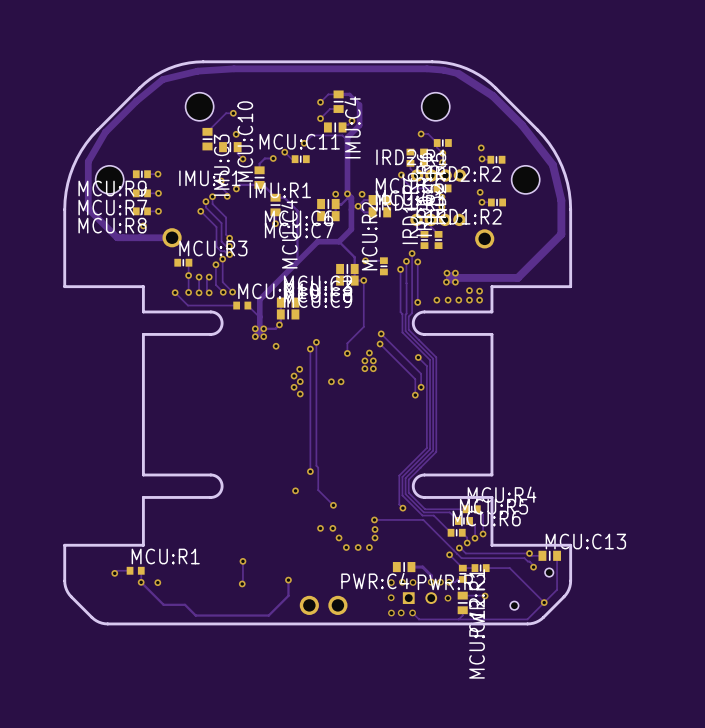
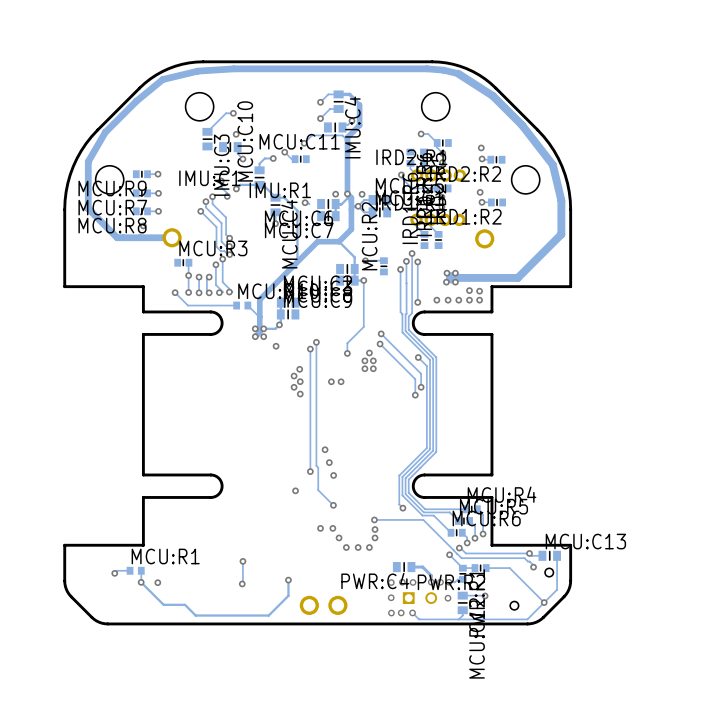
track: none -> (305, 202) (309, 204)
via: none -> (305, 202)
via: none -> (219, 292)
via: (223, 292) -> none
via: none -> (229, 292)
via: (232, 292) -> none
via: none -> (325, 449)
via: none -> (329, 462)
via: none -> (333, 475)

